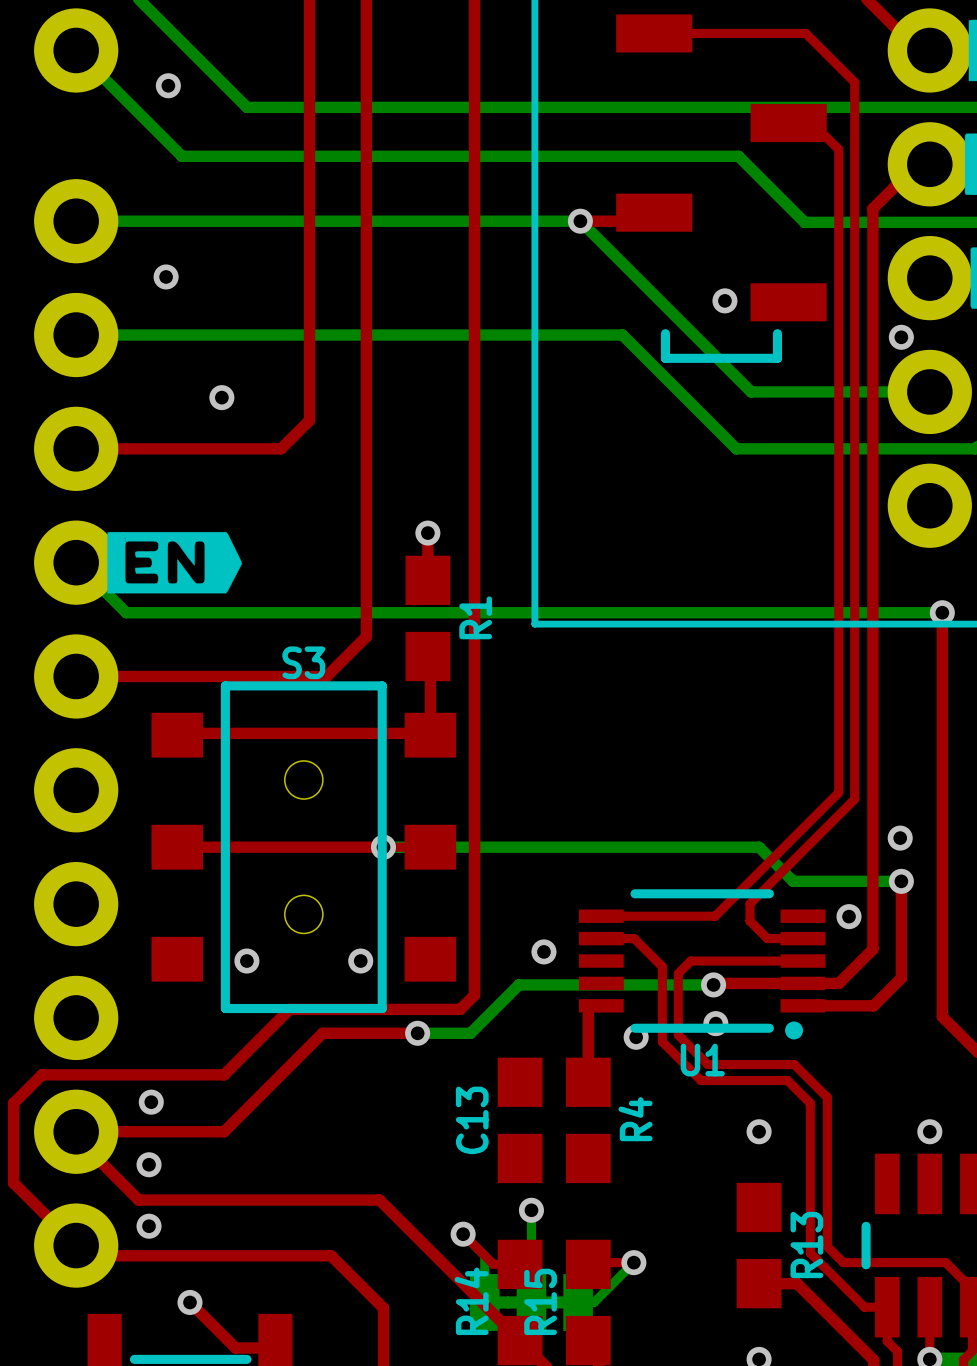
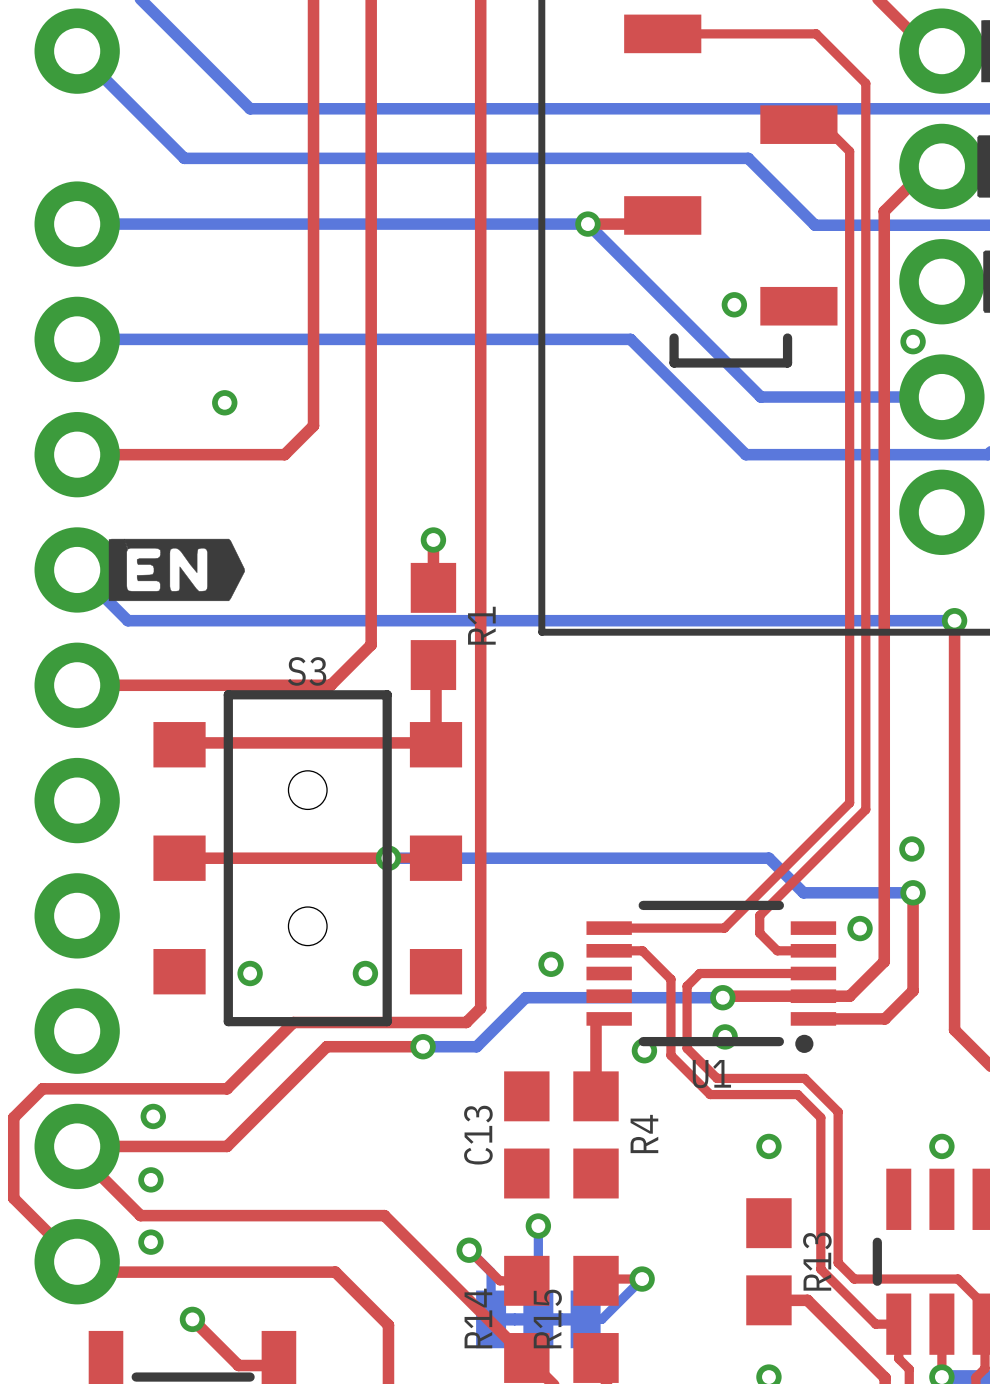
via: (168, 85) -> none
via: (166, 276) -> none

